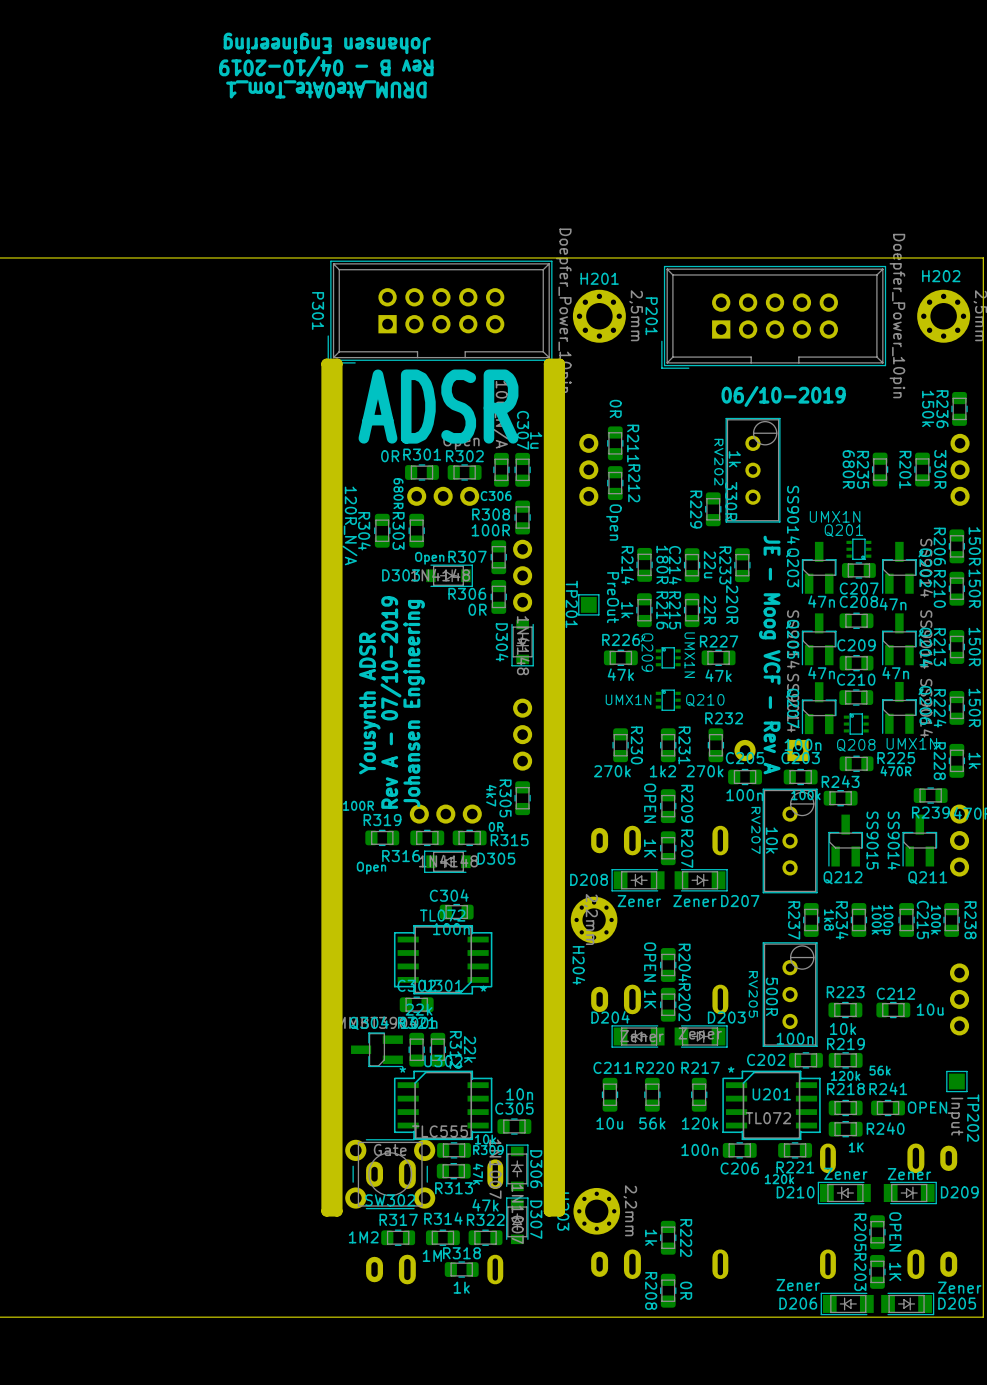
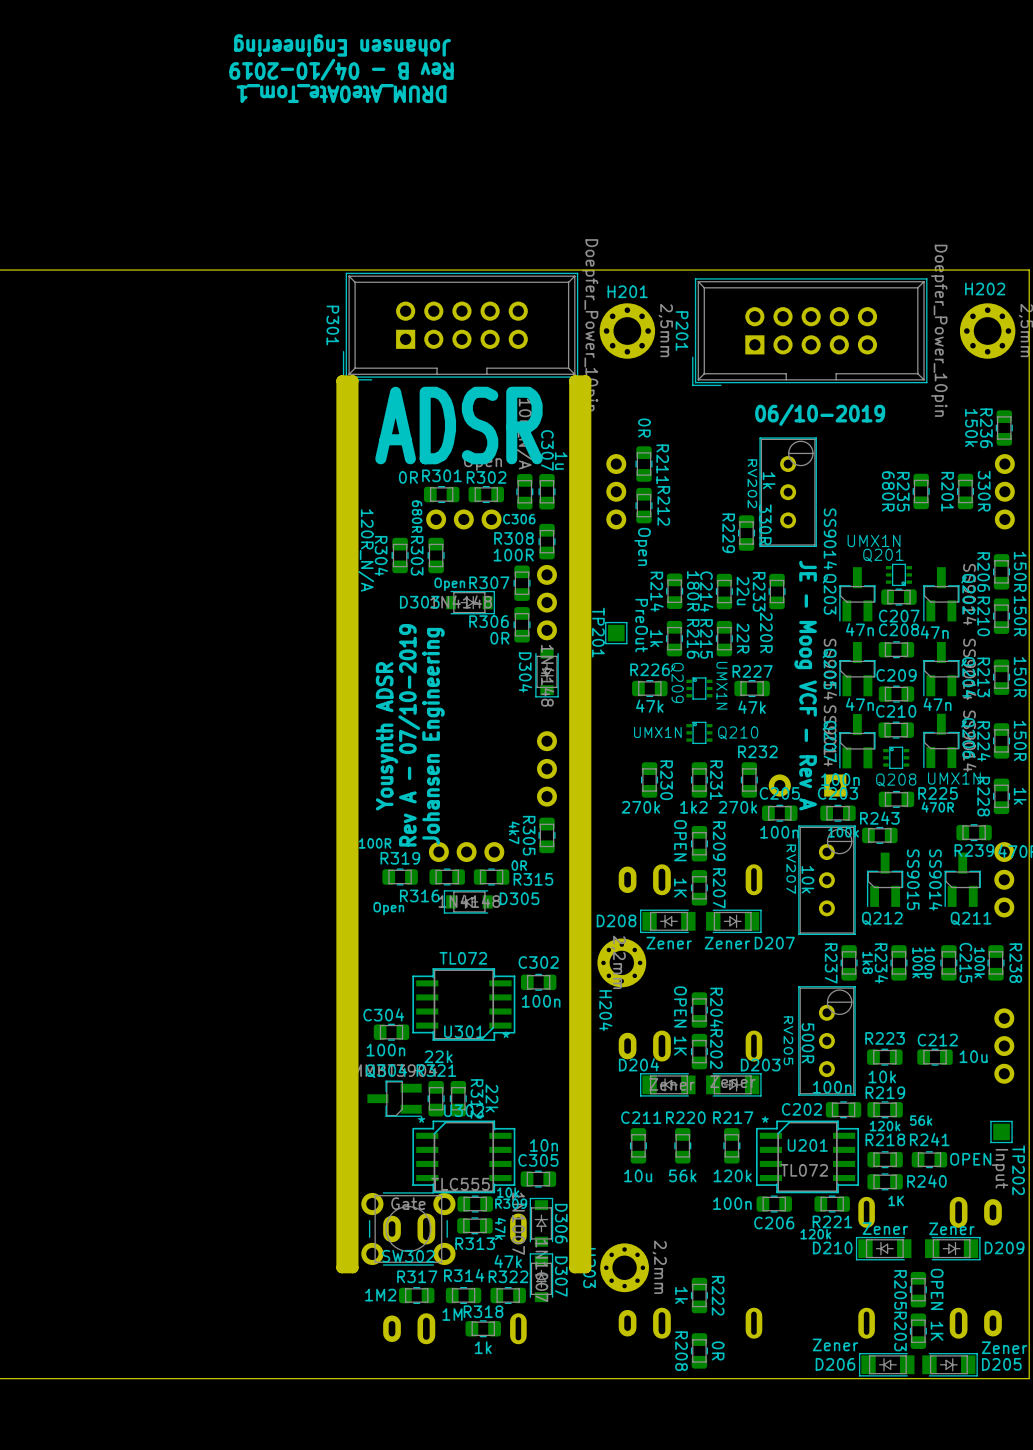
C304 position: (456, 912) -> (391, 1032)
C302 position: (416, 1004) -> (538, 982)

